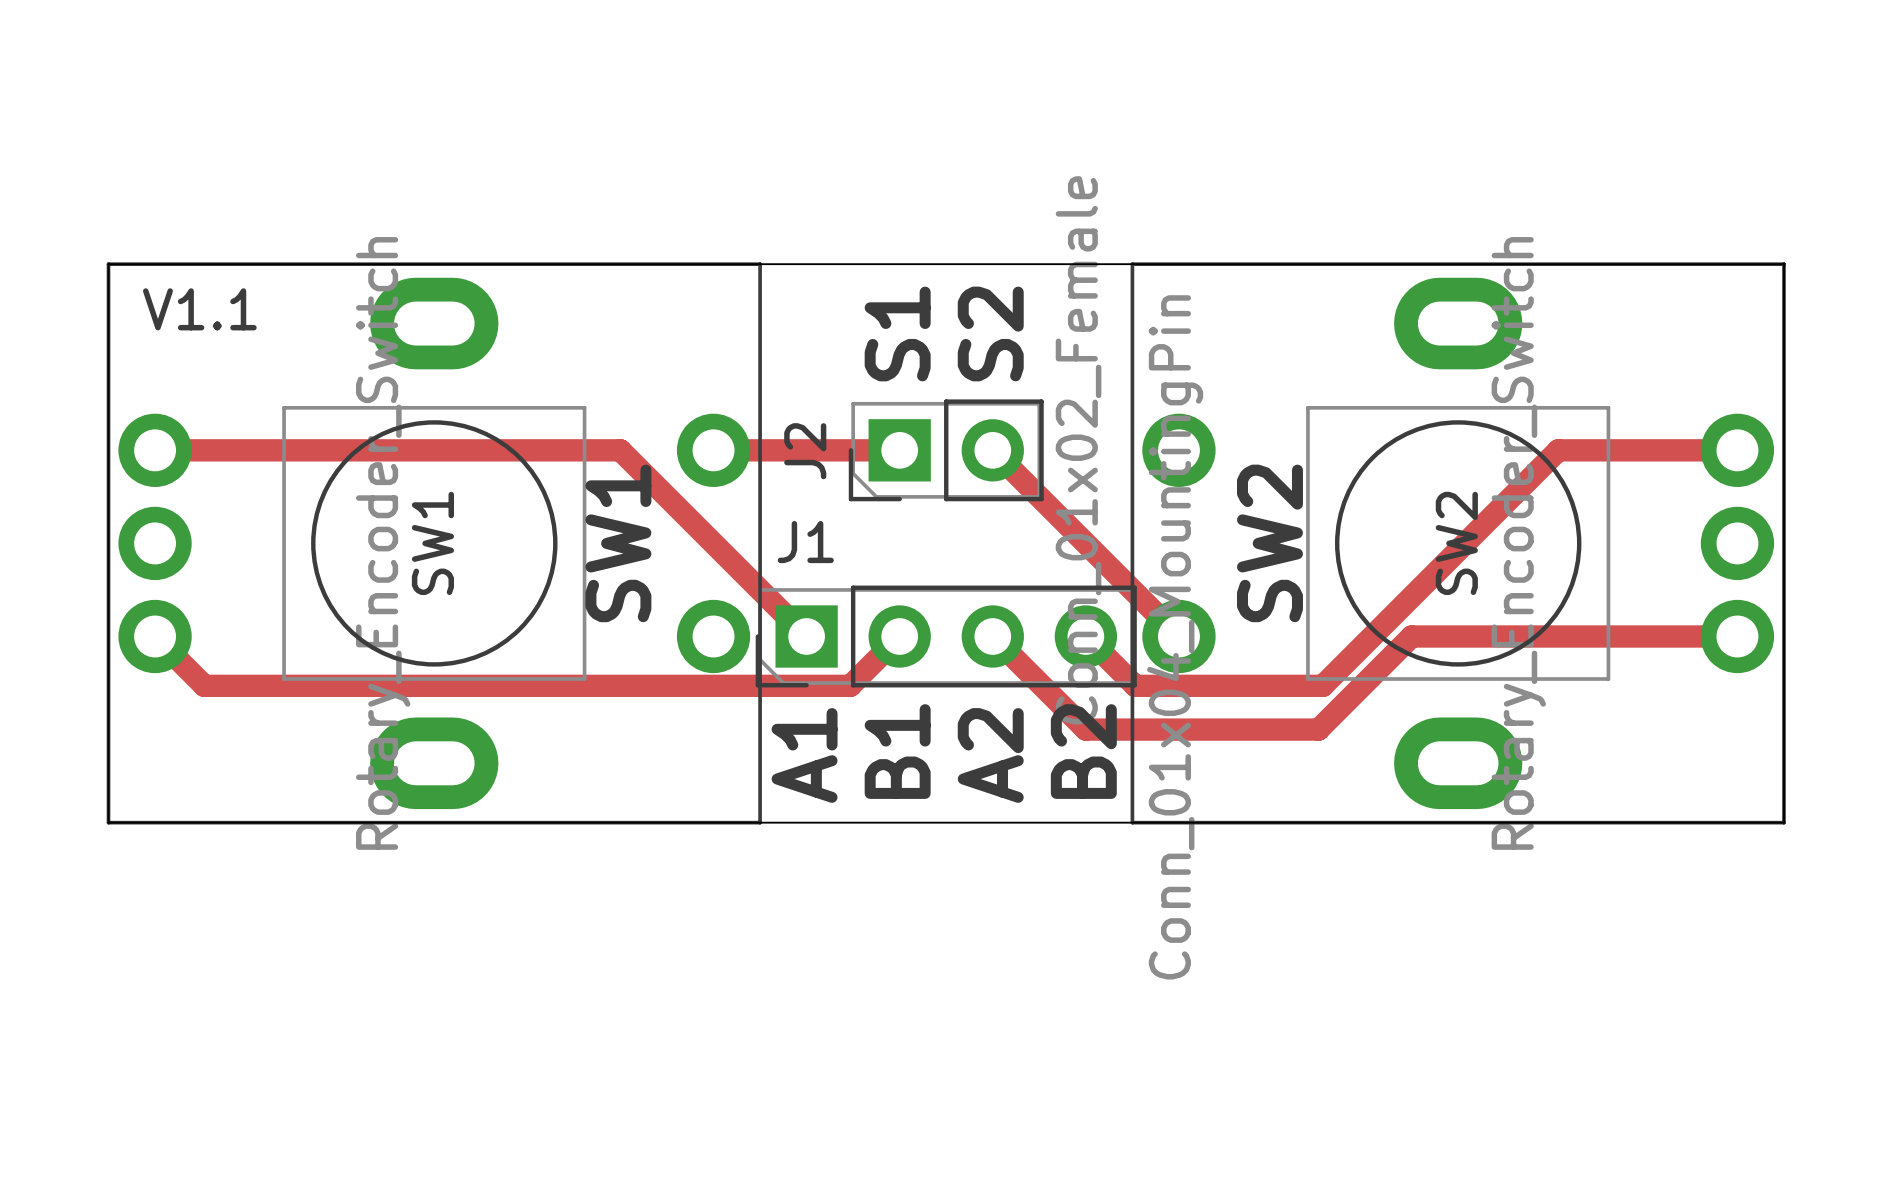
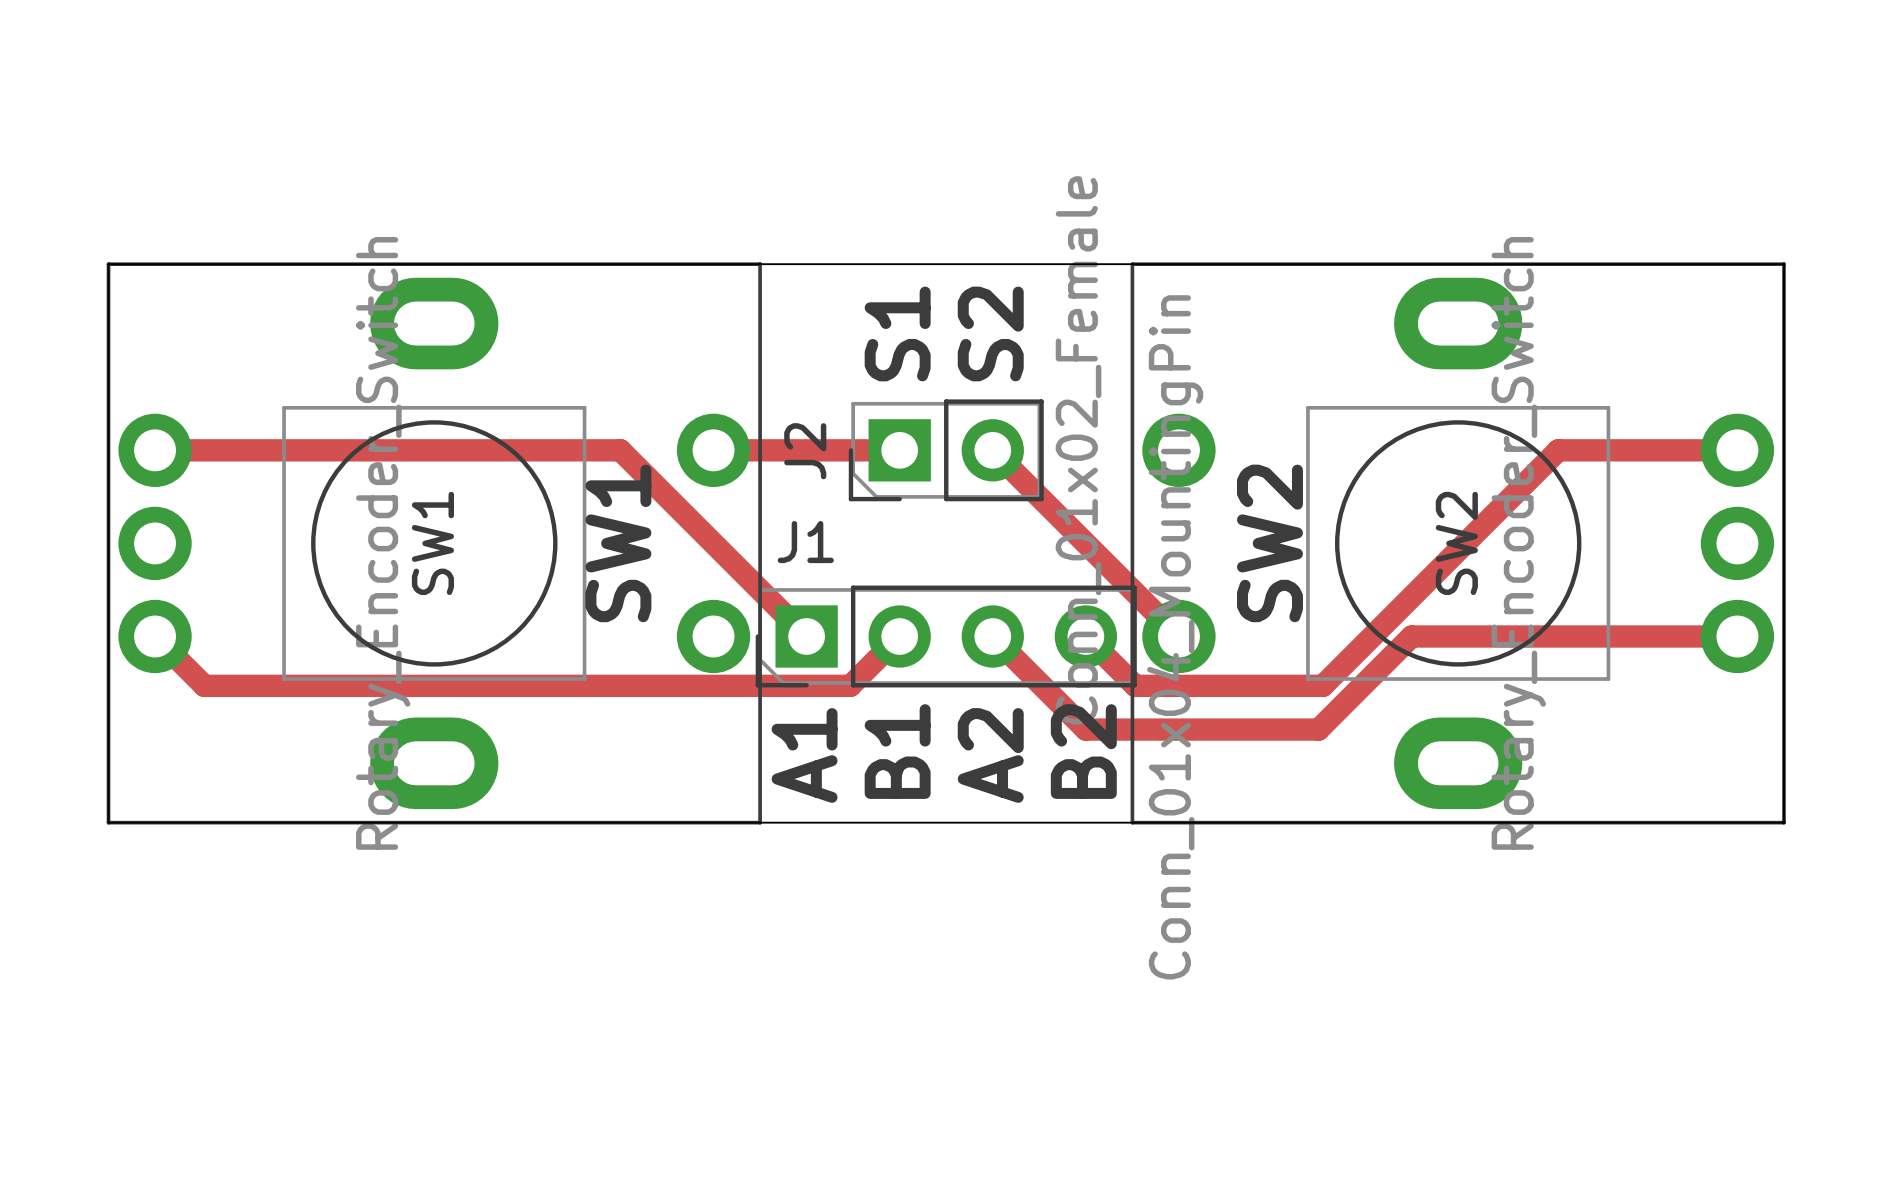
text: V1.1 (199, 309) -> none

